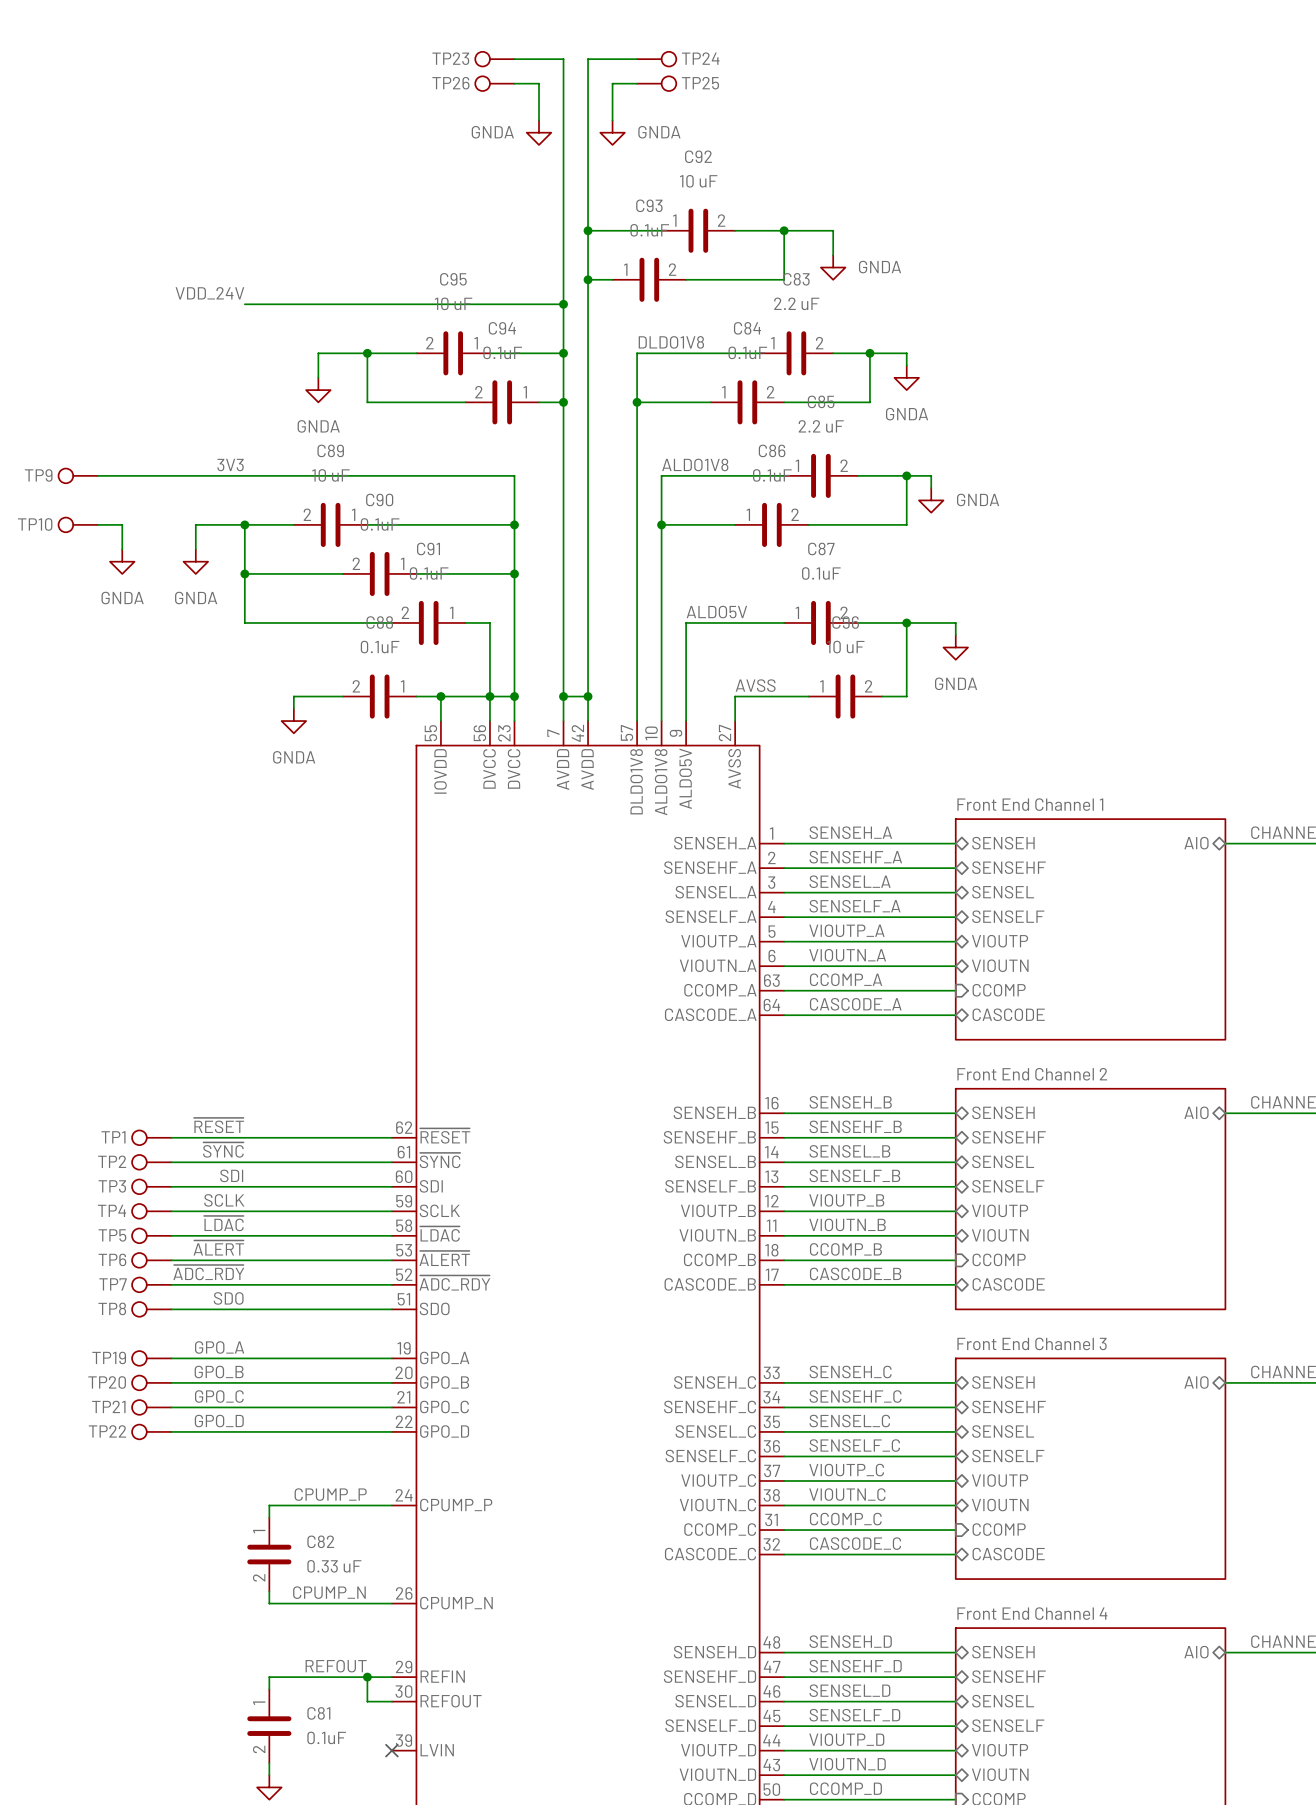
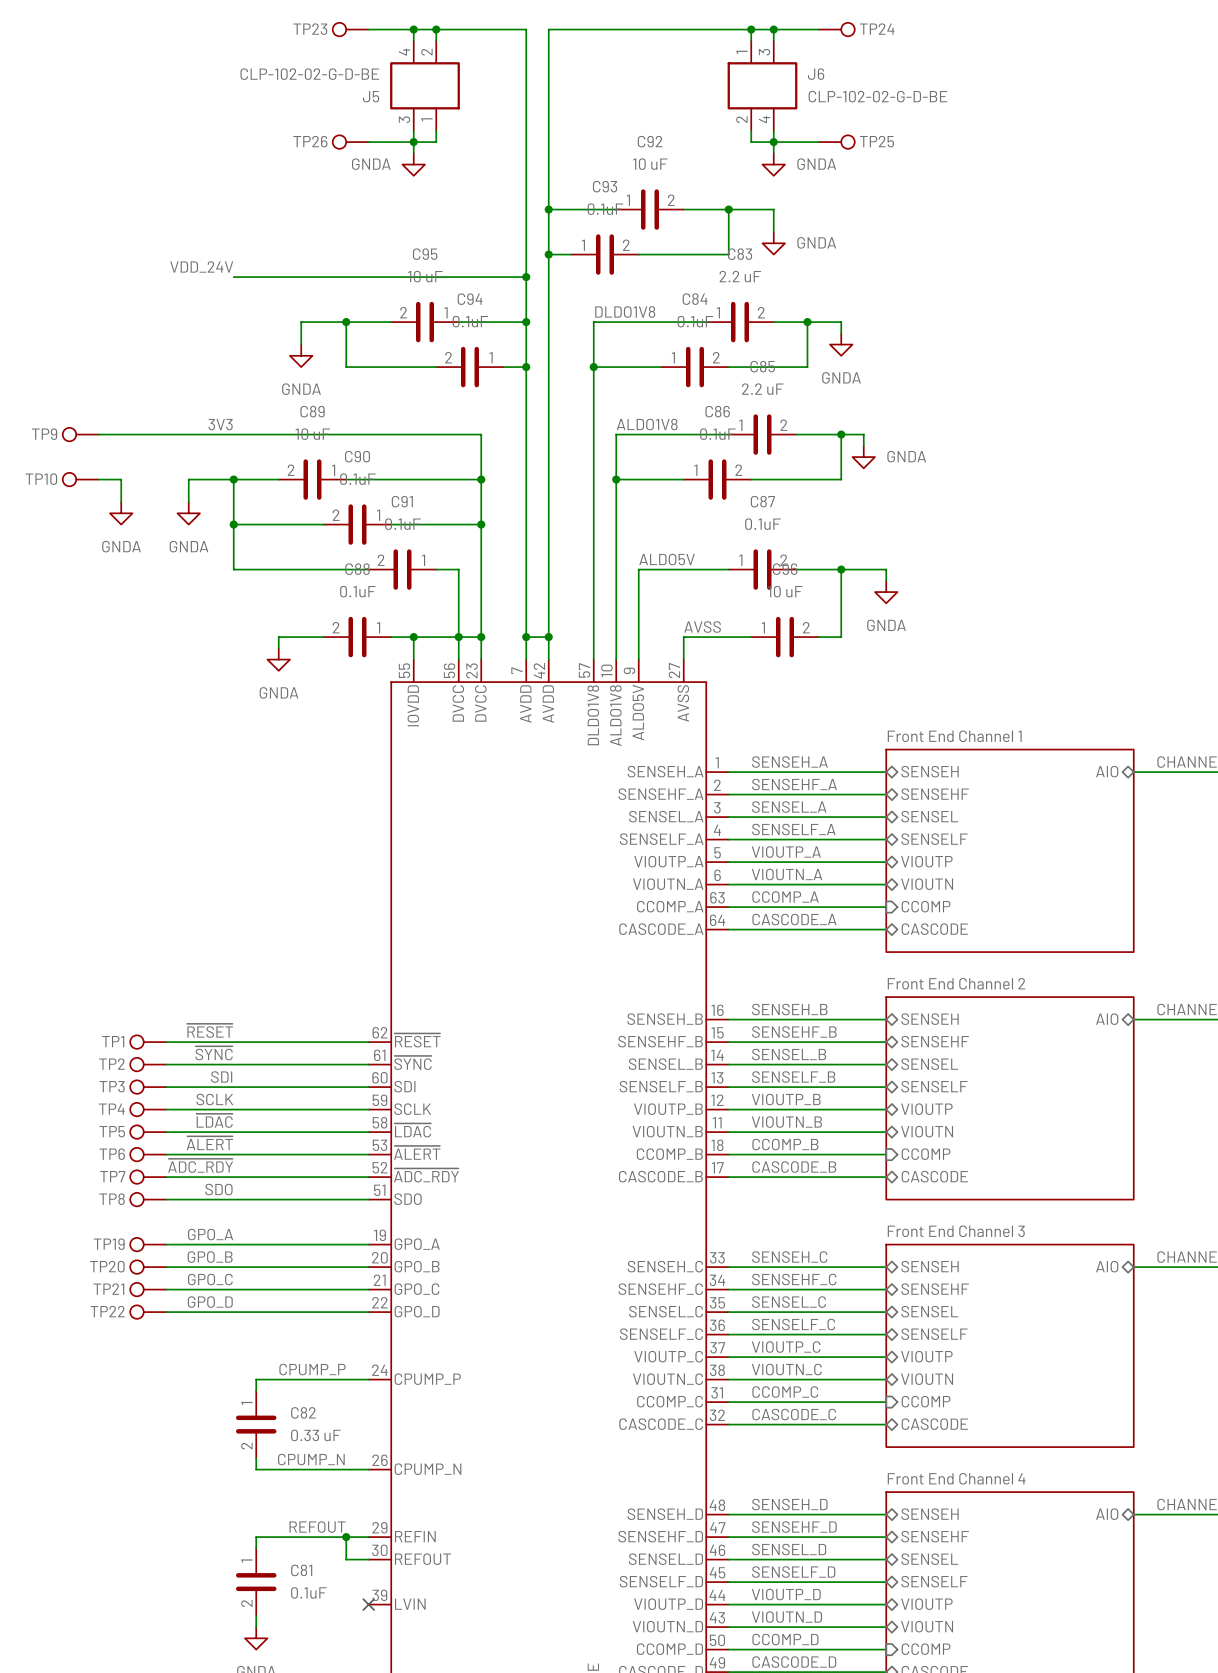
wire: none -> (413, 29) (413, 40)
junction: none -> (413, 29)
wire: none -> (436, 29) (436, 40)
junction: none -> (436, 29)
wire: none -> (751, 29) (751, 40)
junction: none -> (751, 29)
wire: none -> (773, 29) (773, 40)
junction: none -> (773, 29)
TP23 position: (494, 59) -> (350, 29)
wire: (514, 59) (563, 59) -> (368, 29) (526, 29) (526, 52)
wire: (588, 59) (637, 59) -> (548, 52) (548, 29) (818, 29)
TP24 position: (656, 59) -> (836, 29)
TP26 position: (494, 83) -> (350, 142)
wire: (514, 83) (539, 83) (539, 120) -> none
wire: (637, 83) (612, 83) (612, 120) -> none
TP25 position: (656, 83) -> (836, 142)
J5: none -> CLP-102-02-G-D-BE (424, 85)
J6: none -> CLP-102-02-G-D-BE (762, 85)
power symbol: GNDA (539, 132) -> none
power symbol: GNDA (612, 132) -> none
wire: none -> (413, 130) (413, 153)
wire: none -> (436, 130) (436, 142) (368, 142)
wire: none -> (751, 130) (751, 142) (818, 142)
wire: none -> (773, 130) (773, 153)
junction: none -> (413, 142)
junction: none -> (773, 142)
power symbol: none -> GNDA (413, 164)
power symbol: none -> GNDA (773, 164)

